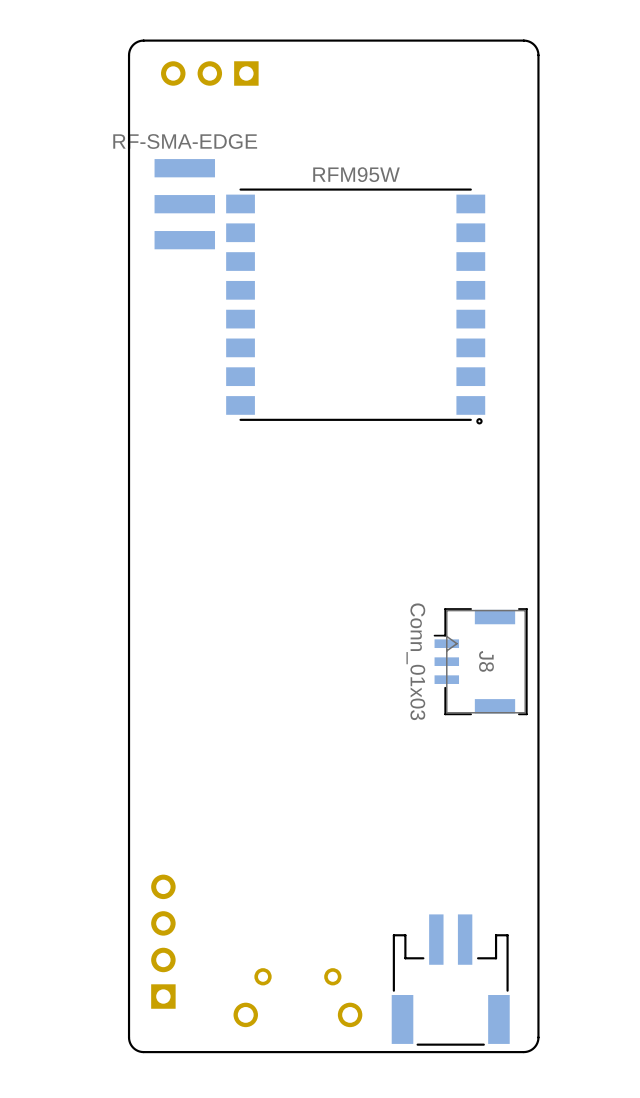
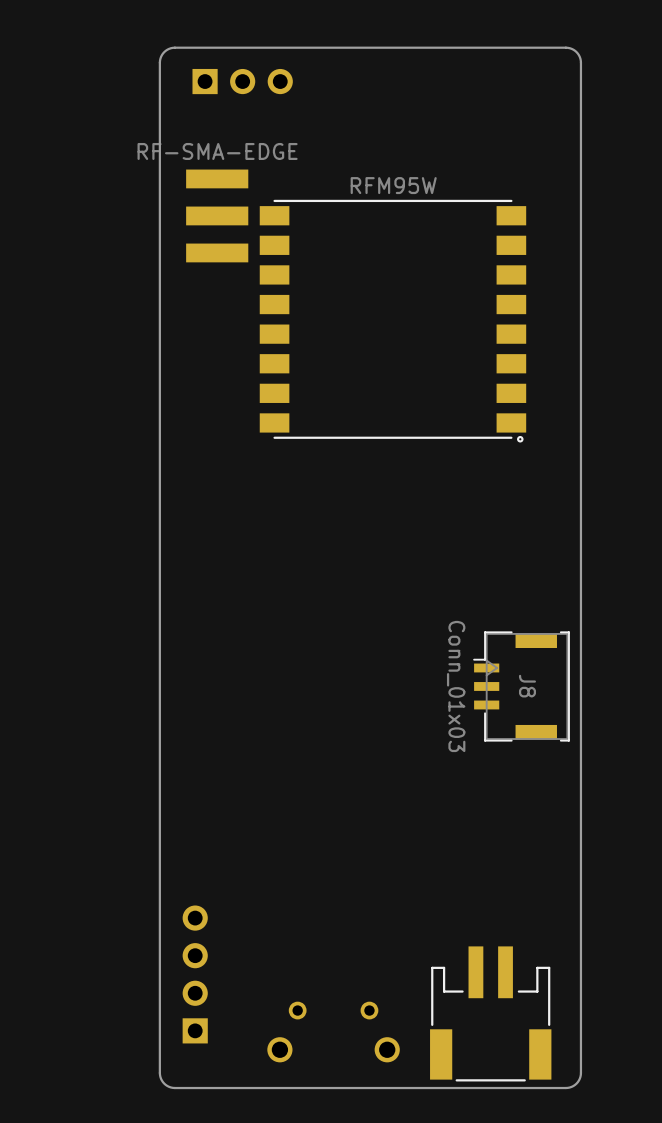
part rotation: 0° (209, 73) -> 180° (242, 81)

